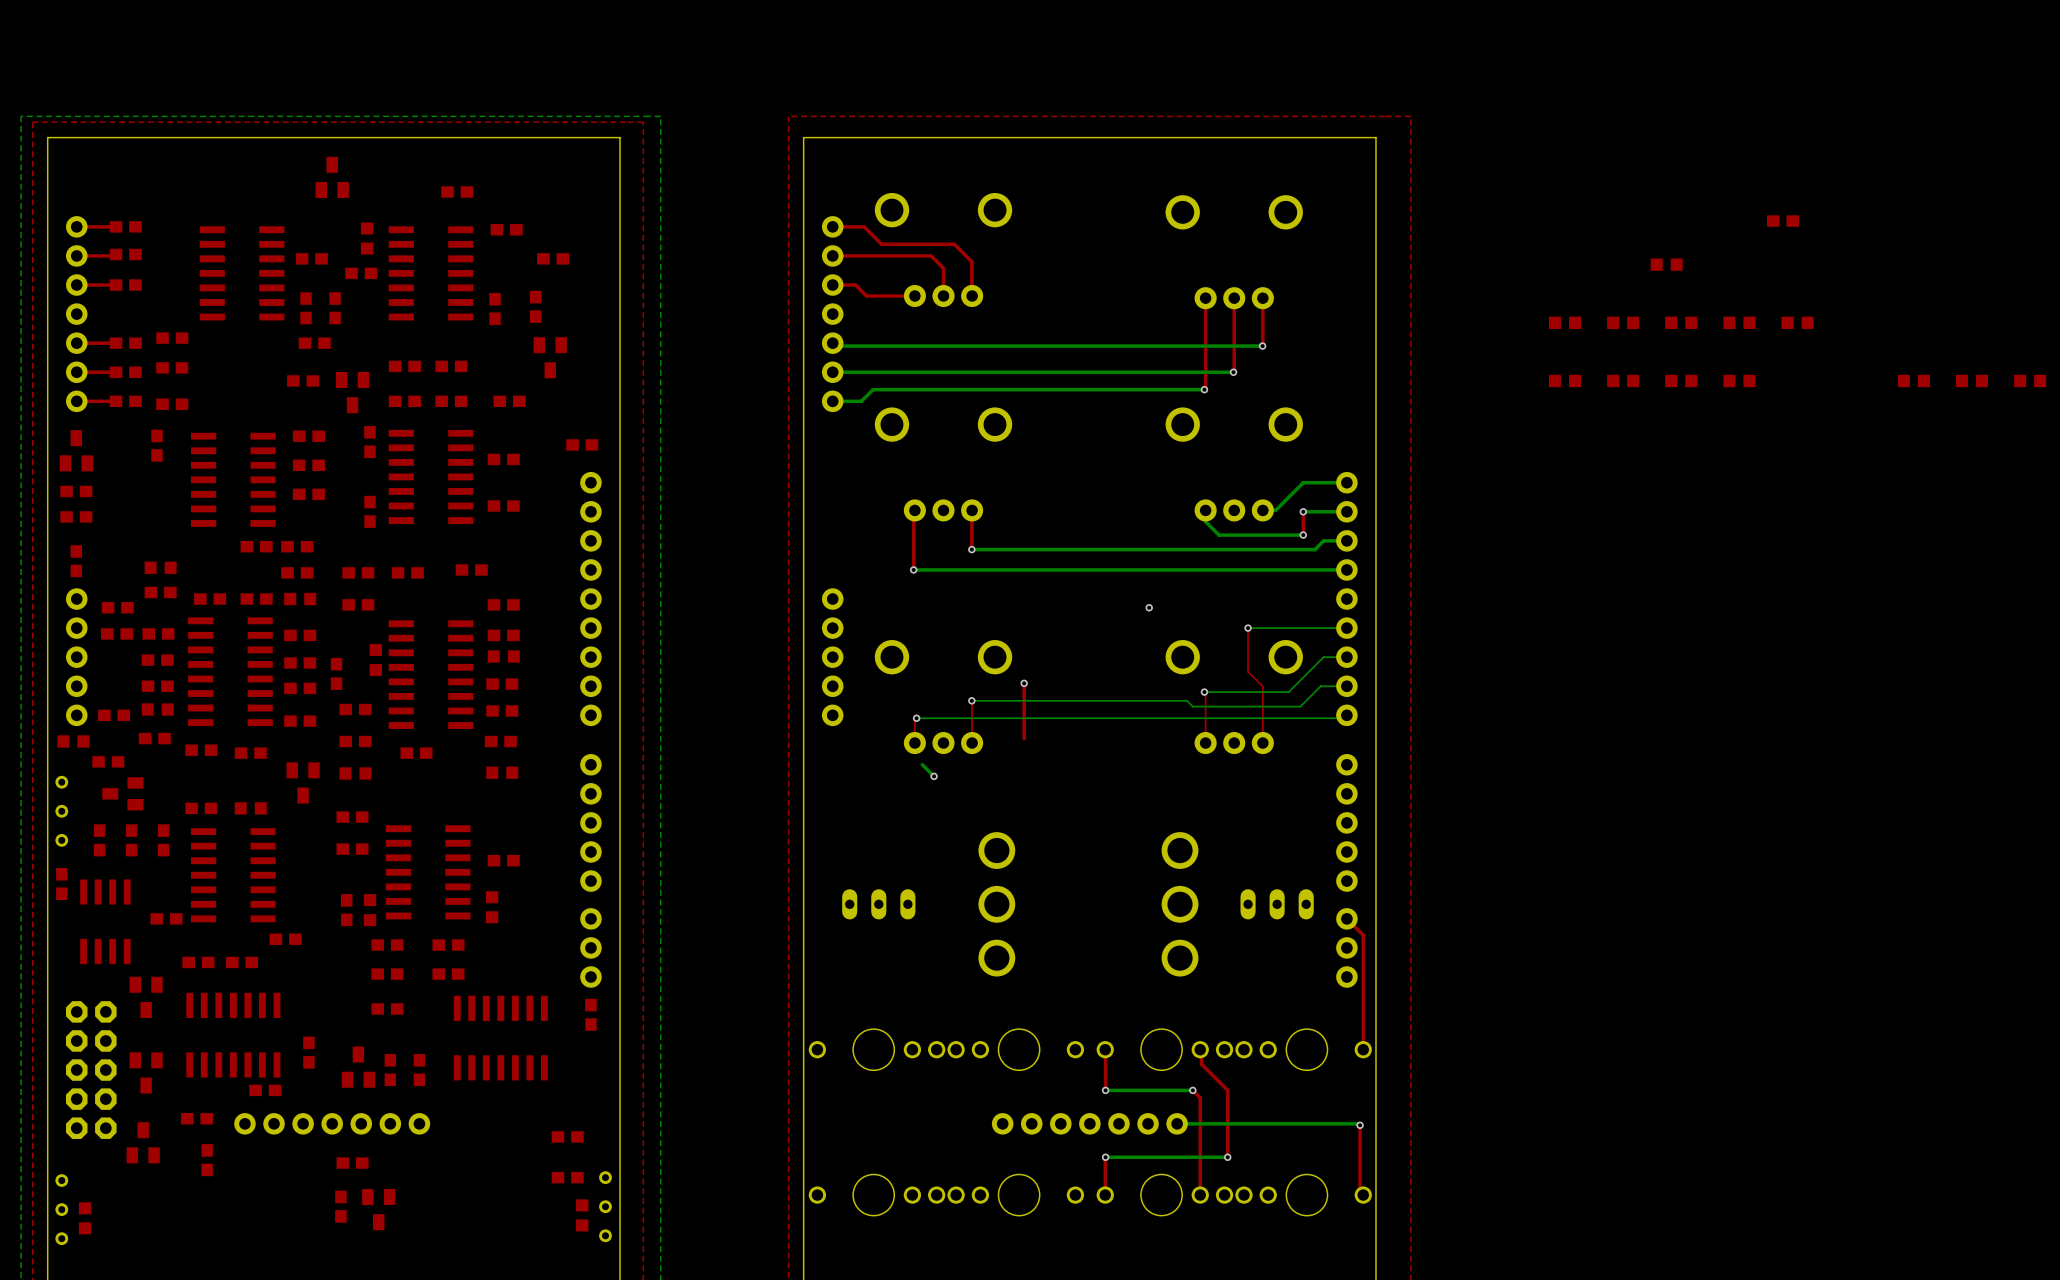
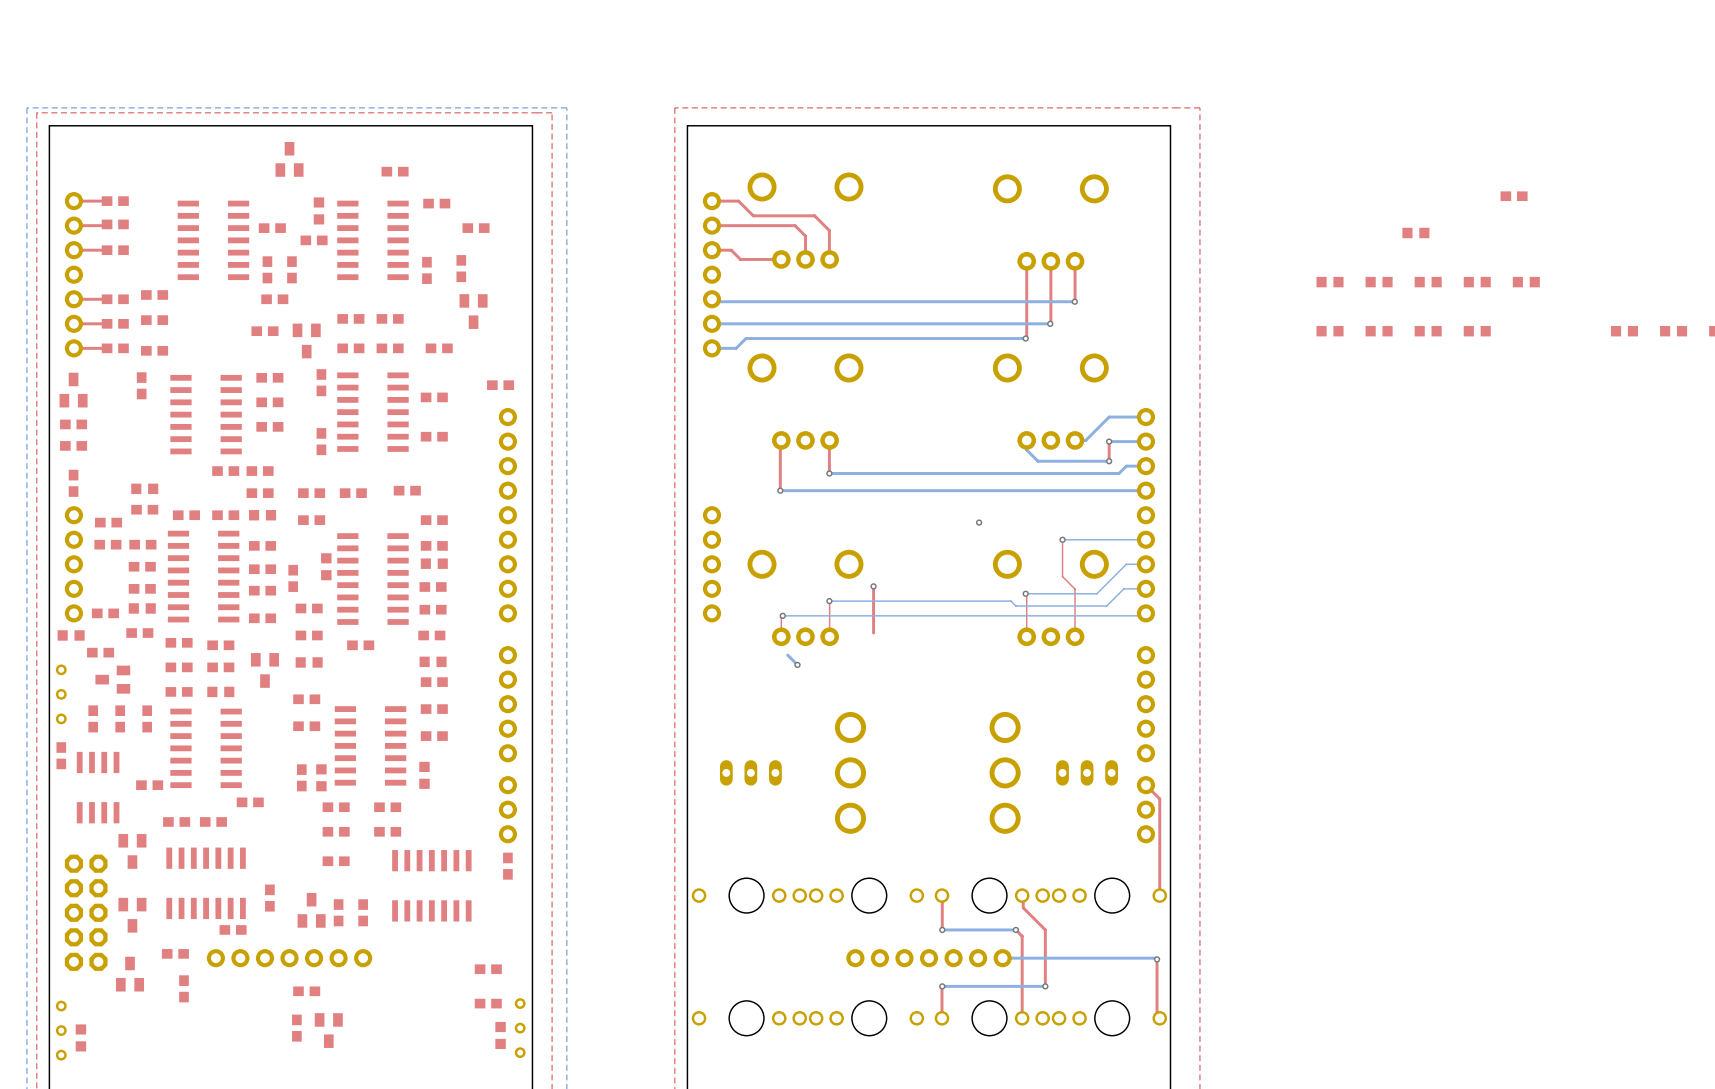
part: none -> (179, 667)
part: none -> (220, 667)
part: none -> (434, 682)
part: none -> (434, 709)

